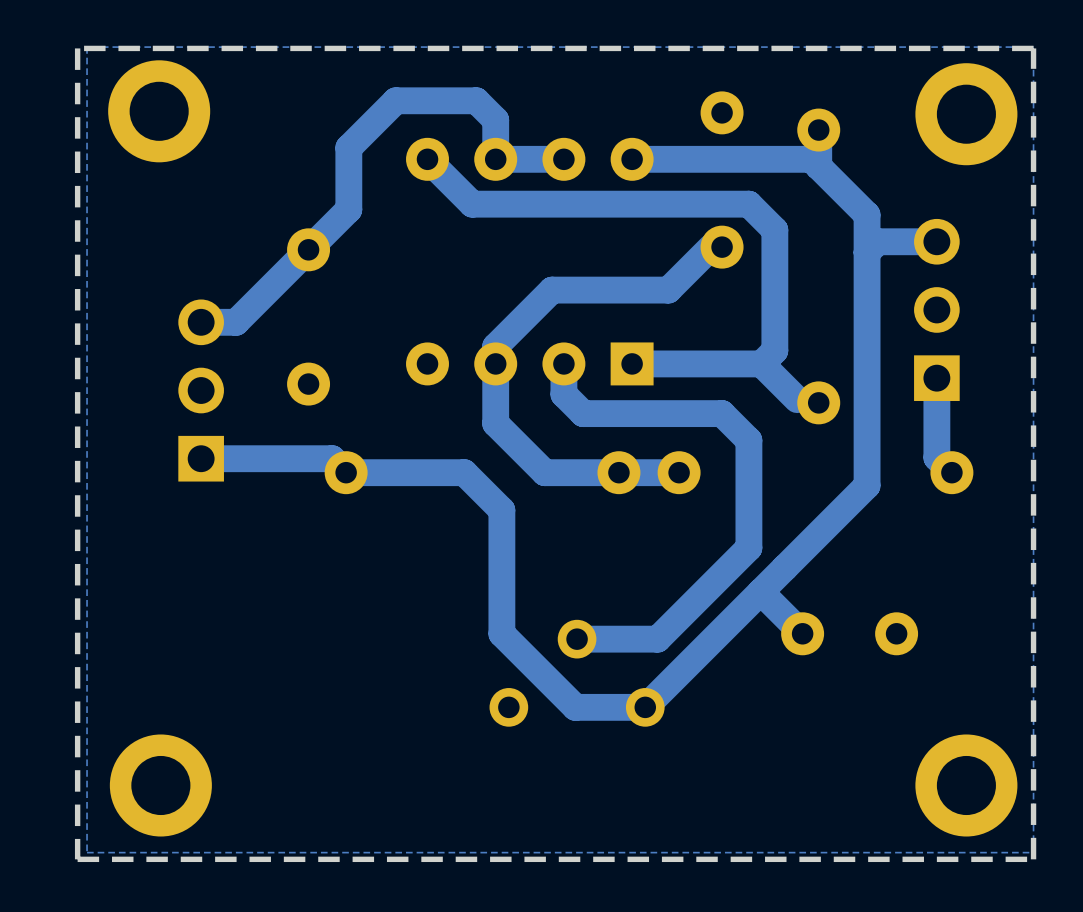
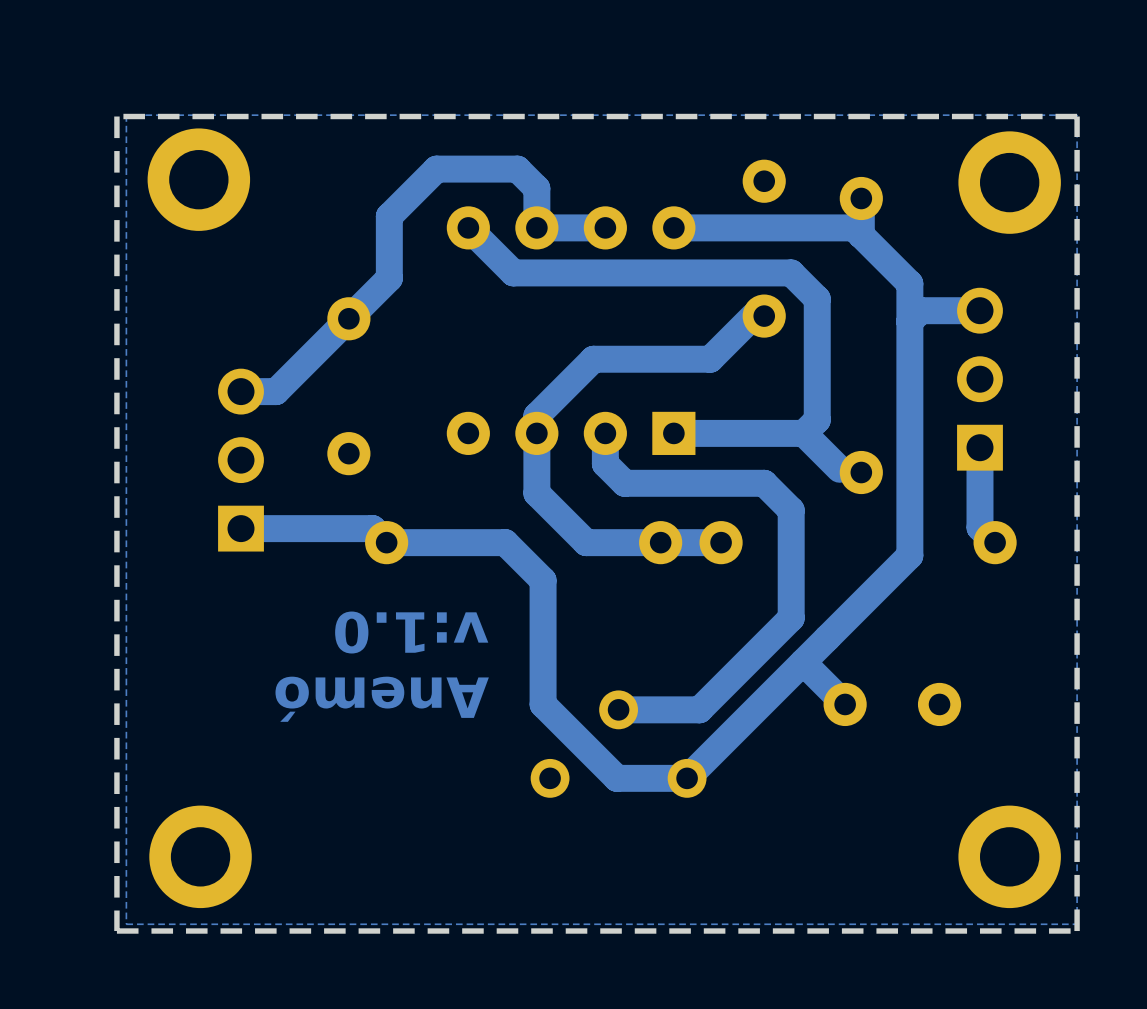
text: none -> v:1.0 (411, 632)
text: none -> Anemó (382, 699)

